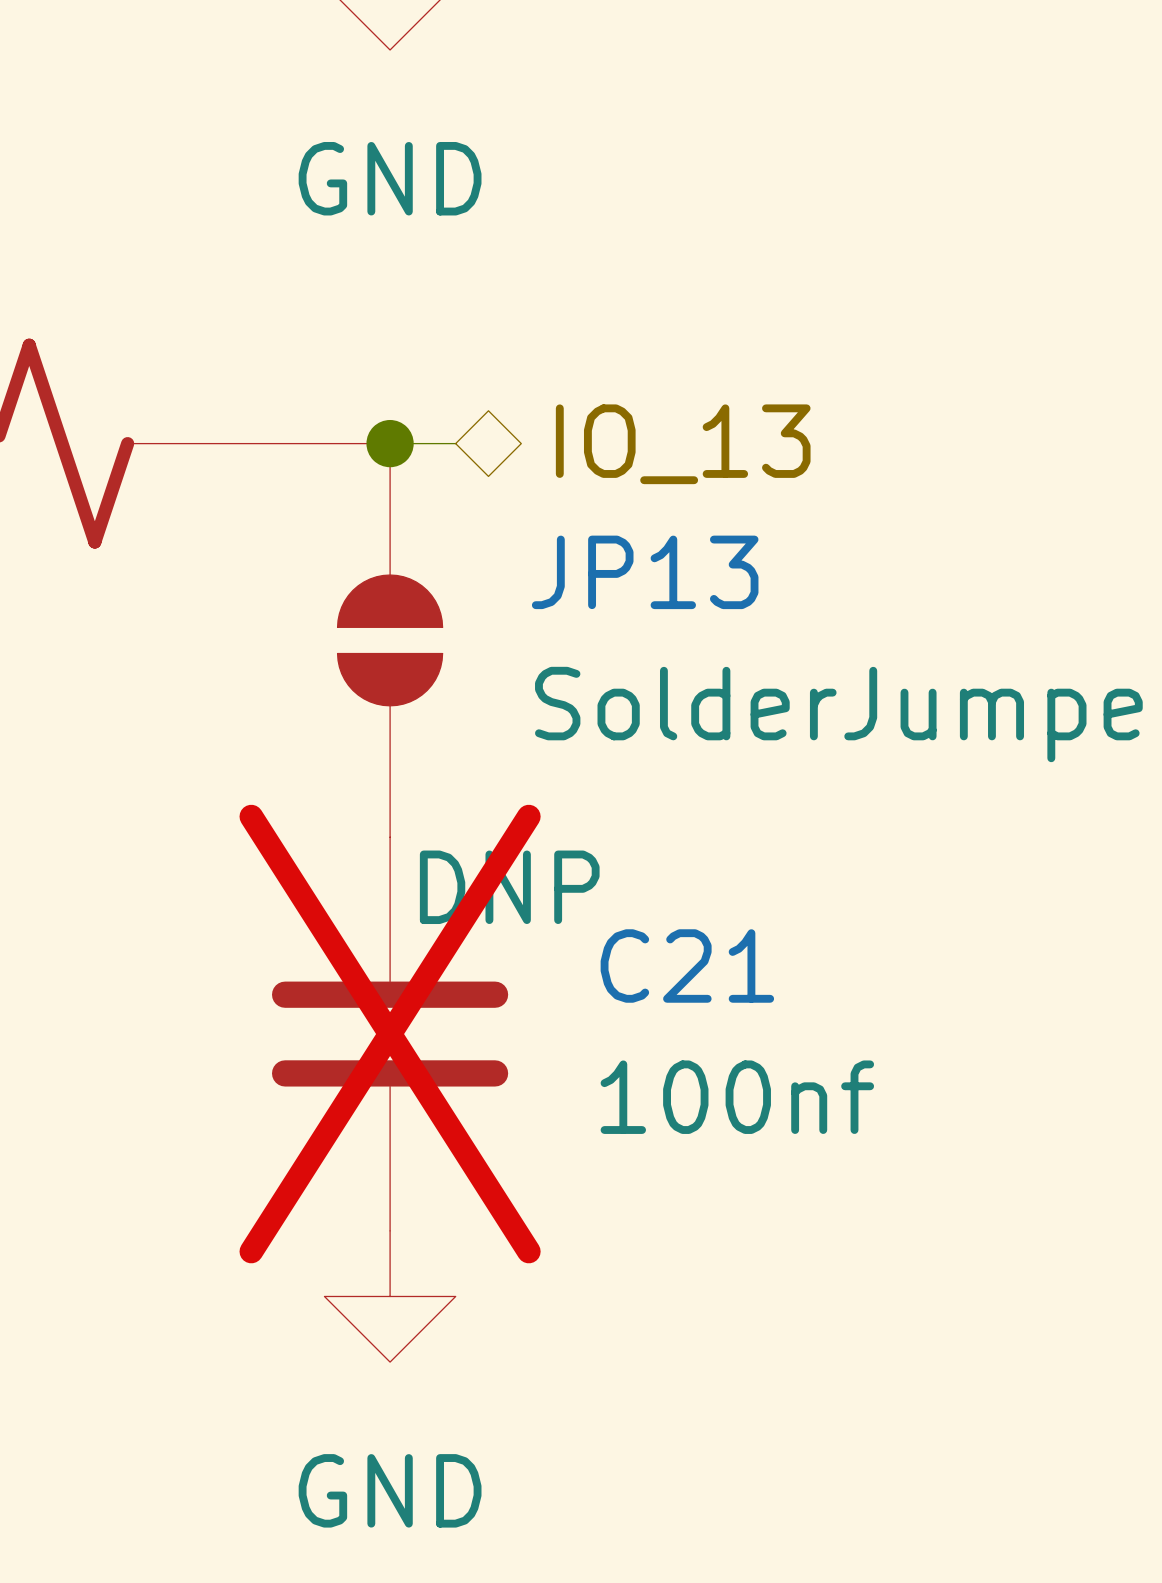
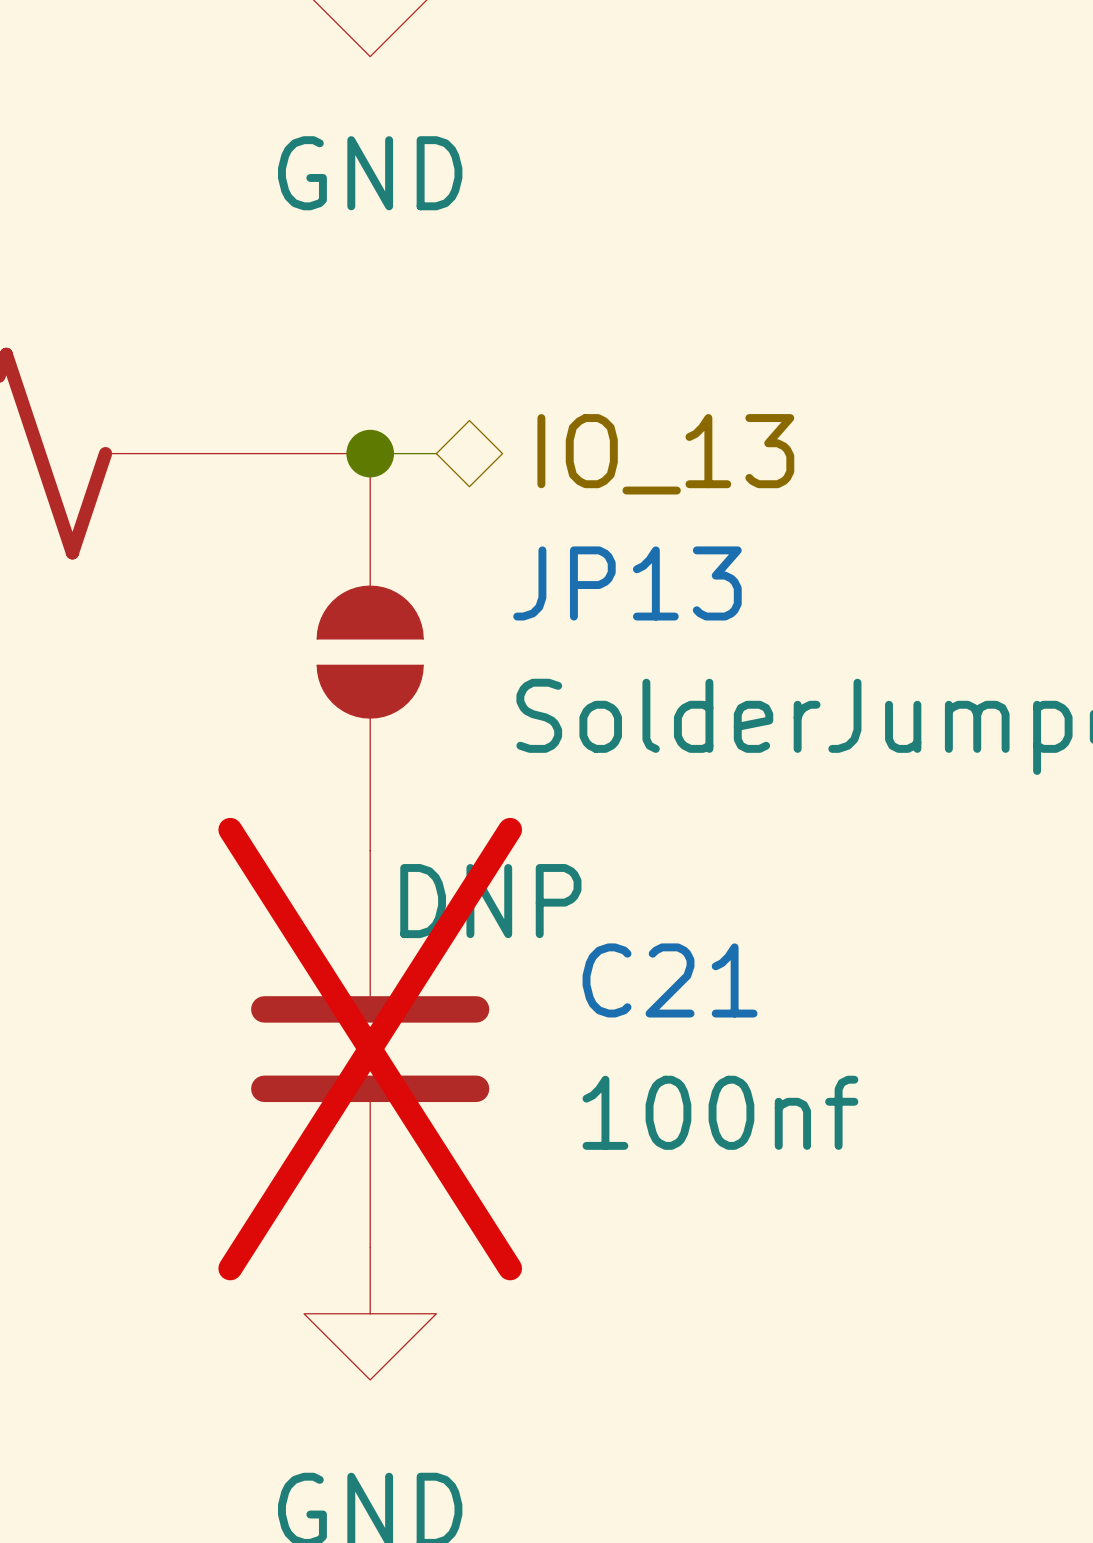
power symbol text position: GND (390, 178) -> GND (370, 173)

